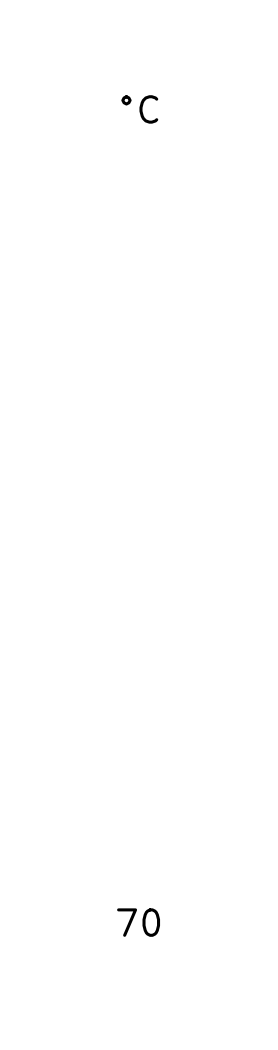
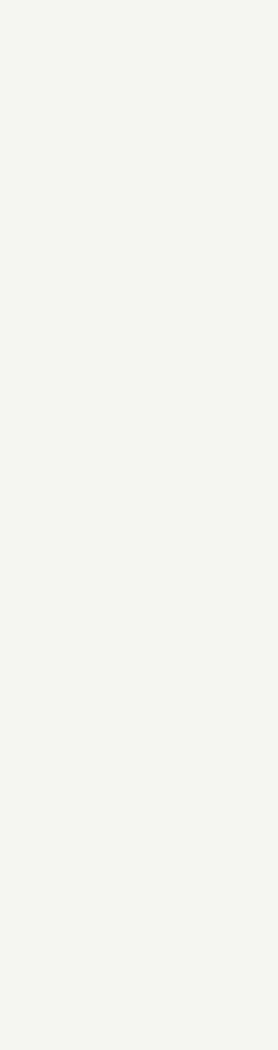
text: °C (139, 109) -> none
text: 70 (138, 922) -> none

